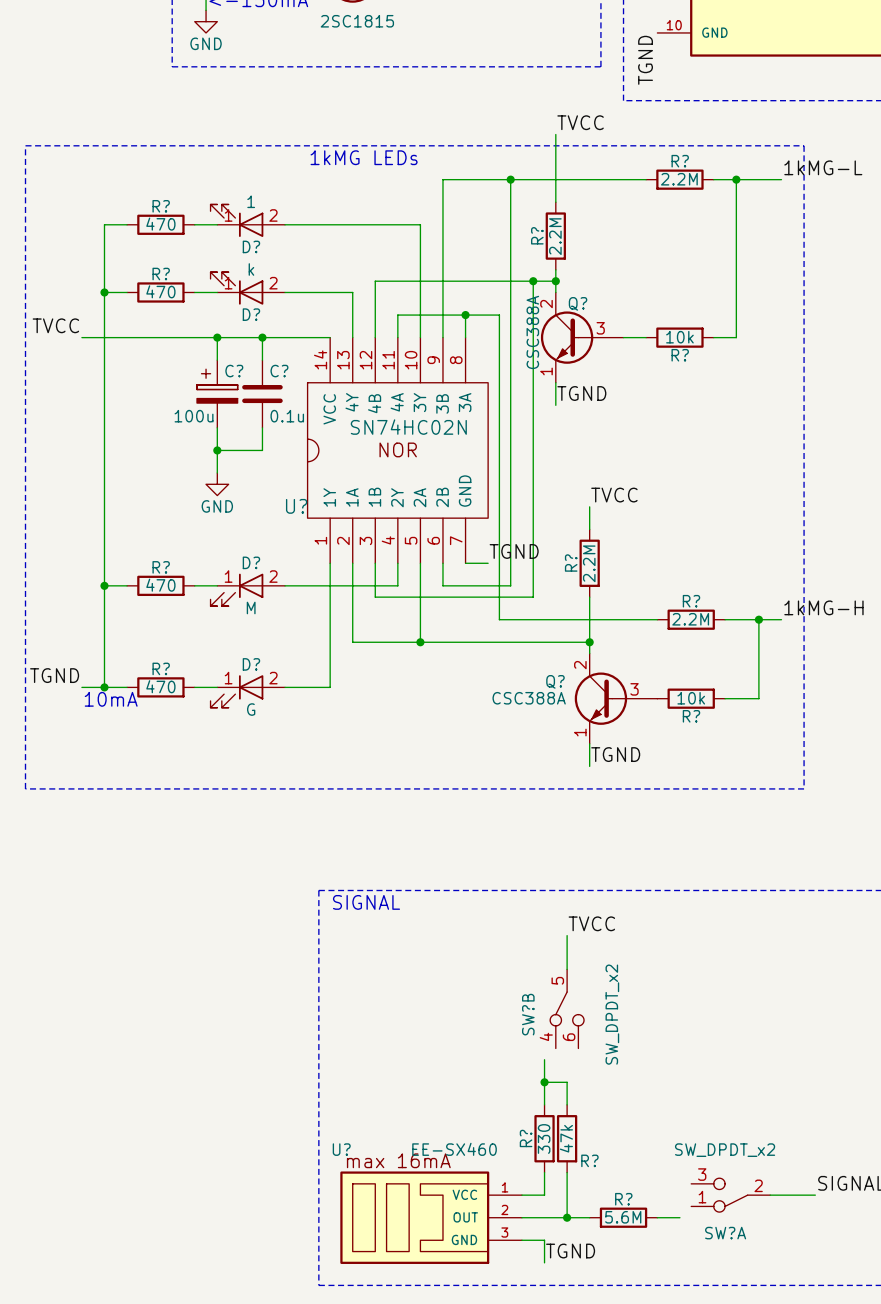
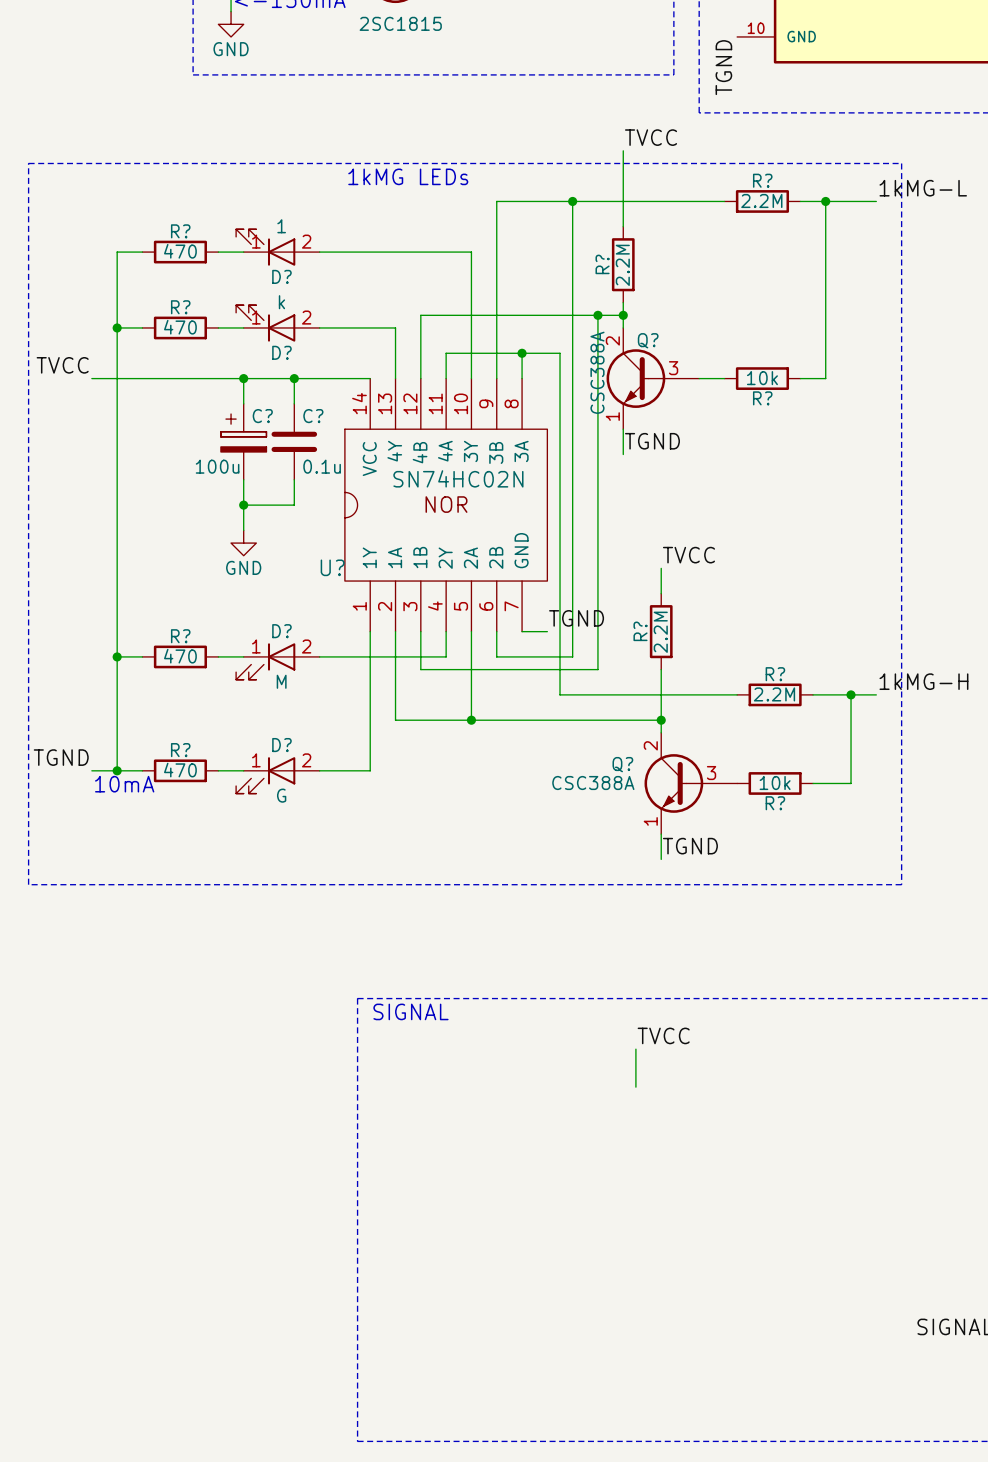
SW?B: SW_DPDT_x2 (552, 1020) -> none
wire: (544, 1059) (544, 1104) -> none
wire: (544, 1082) (567, 1082) (567, 1104) -> none
junction: (544, 1082) -> none
R?: 330 (544, 1138) -> none
R?: 47k (567, 1138) -> none
wire: (544, 1172) (544, 1195) (521, 1195) -> none
wire: (567, 1172) (567, 1217) -> none
wire: (770, 1195) (815, 1195) -> none
SW?A: SW_DPDT_x2 (719, 1209) -> none
U?: EE-SX460 (431, 1217) -> none
wire: (521, 1217) (589, 1217) -> none
junction: (567, 1217) -> none
R?: 5.6M (623, 1217) -> none
wire: (657, 1217) (679, 1217) -> none
wire: (521, 1240) (544, 1240) (544, 1262) -> none
label: TGND (570, 1251) -> none

